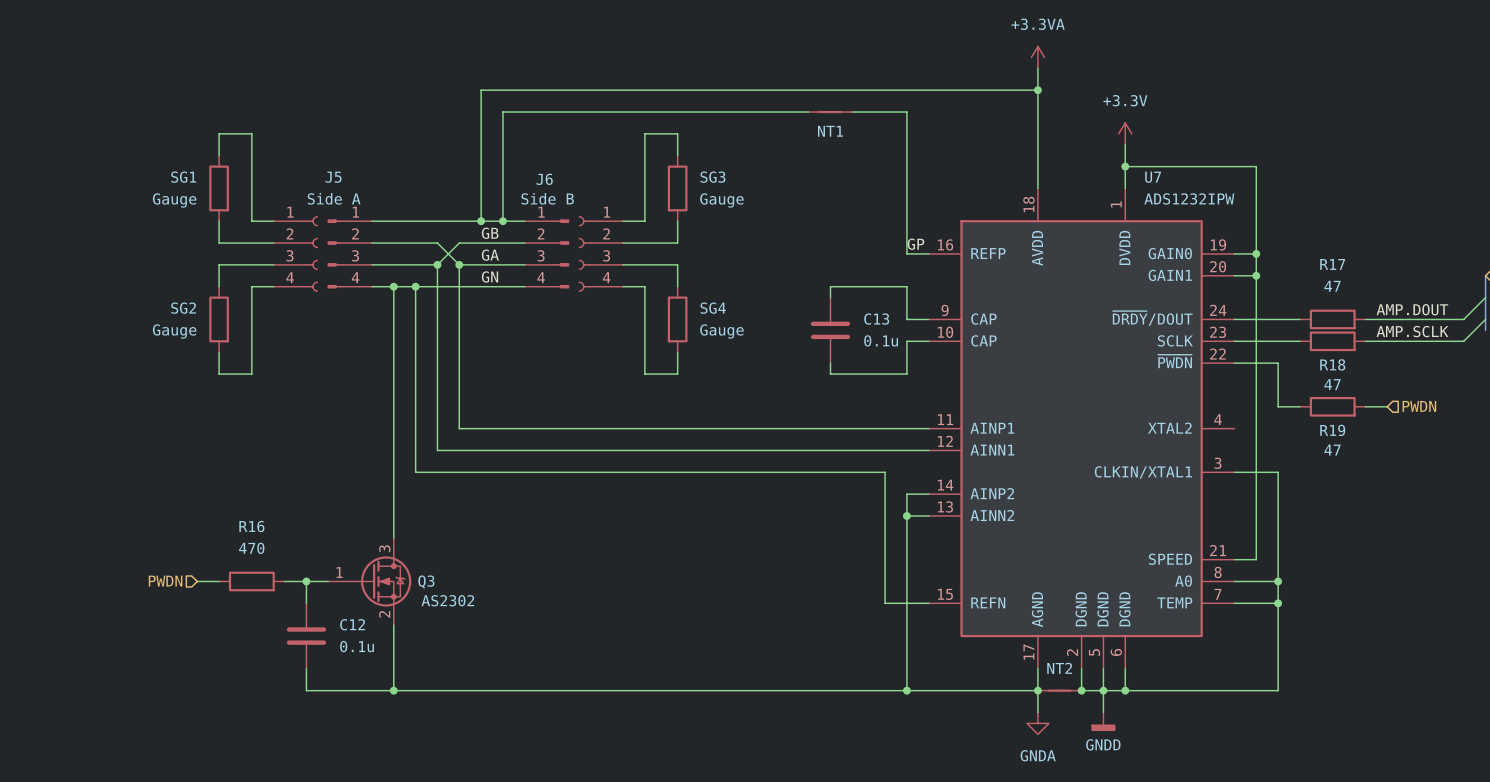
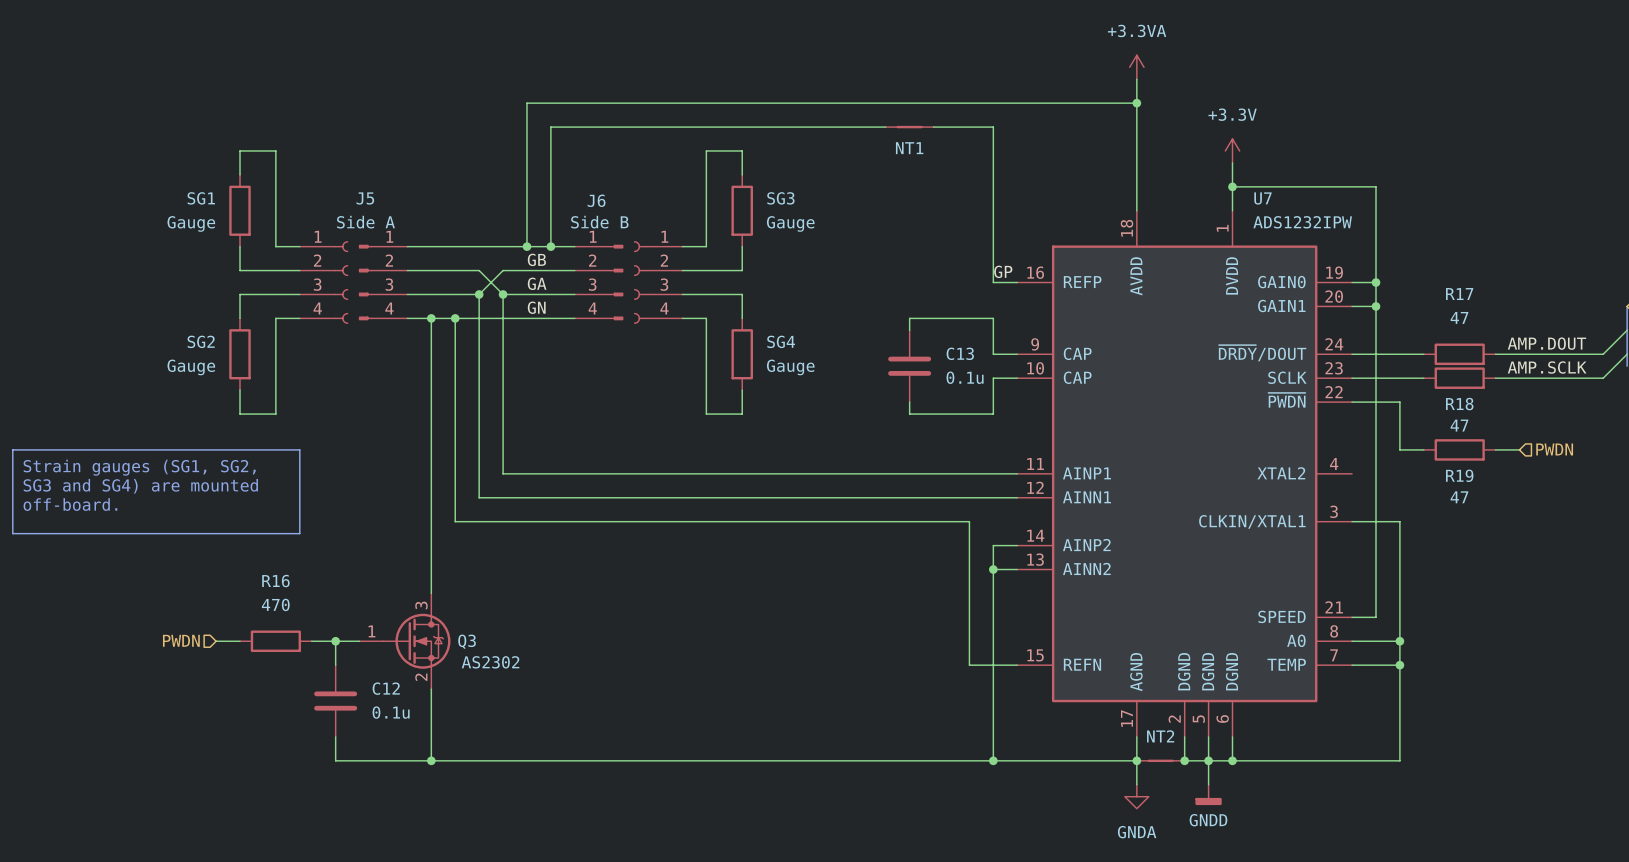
line: none -> (12, 449) (299, 449) (299, 533) (12, 533) (12, 449)
text: none -> Strain gauges (SG1, SG2, (139, 467)
text: none -> SG3 and SG4) are mounted (140, 486)
text: none -> off-board. (70, 504)

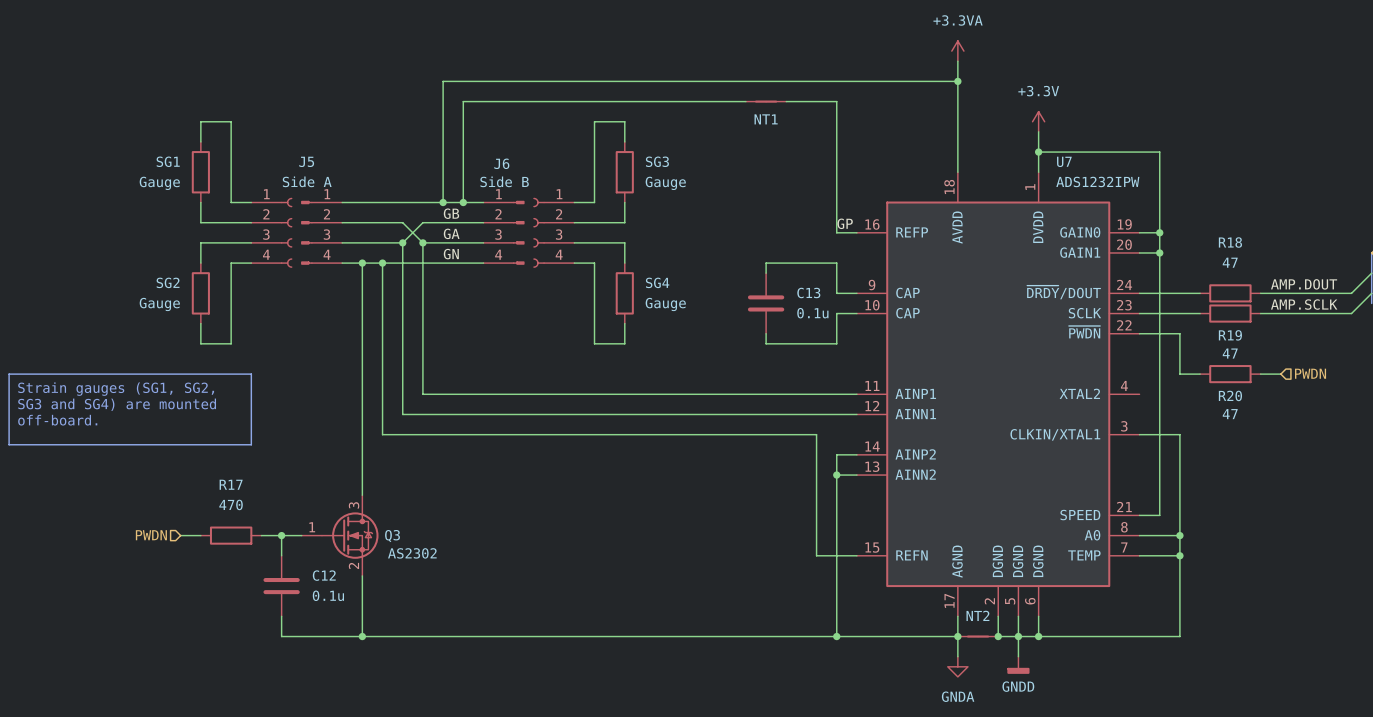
R17 name: R17 (1459, 294) -> R18 (1230, 242)
R18 name: R18 (1459, 404) -> R19 (1230, 335)
R19 name: R19 (1459, 475) -> R20 (1230, 395)
R16 name: R16 (275, 581) -> R17 (231, 484)

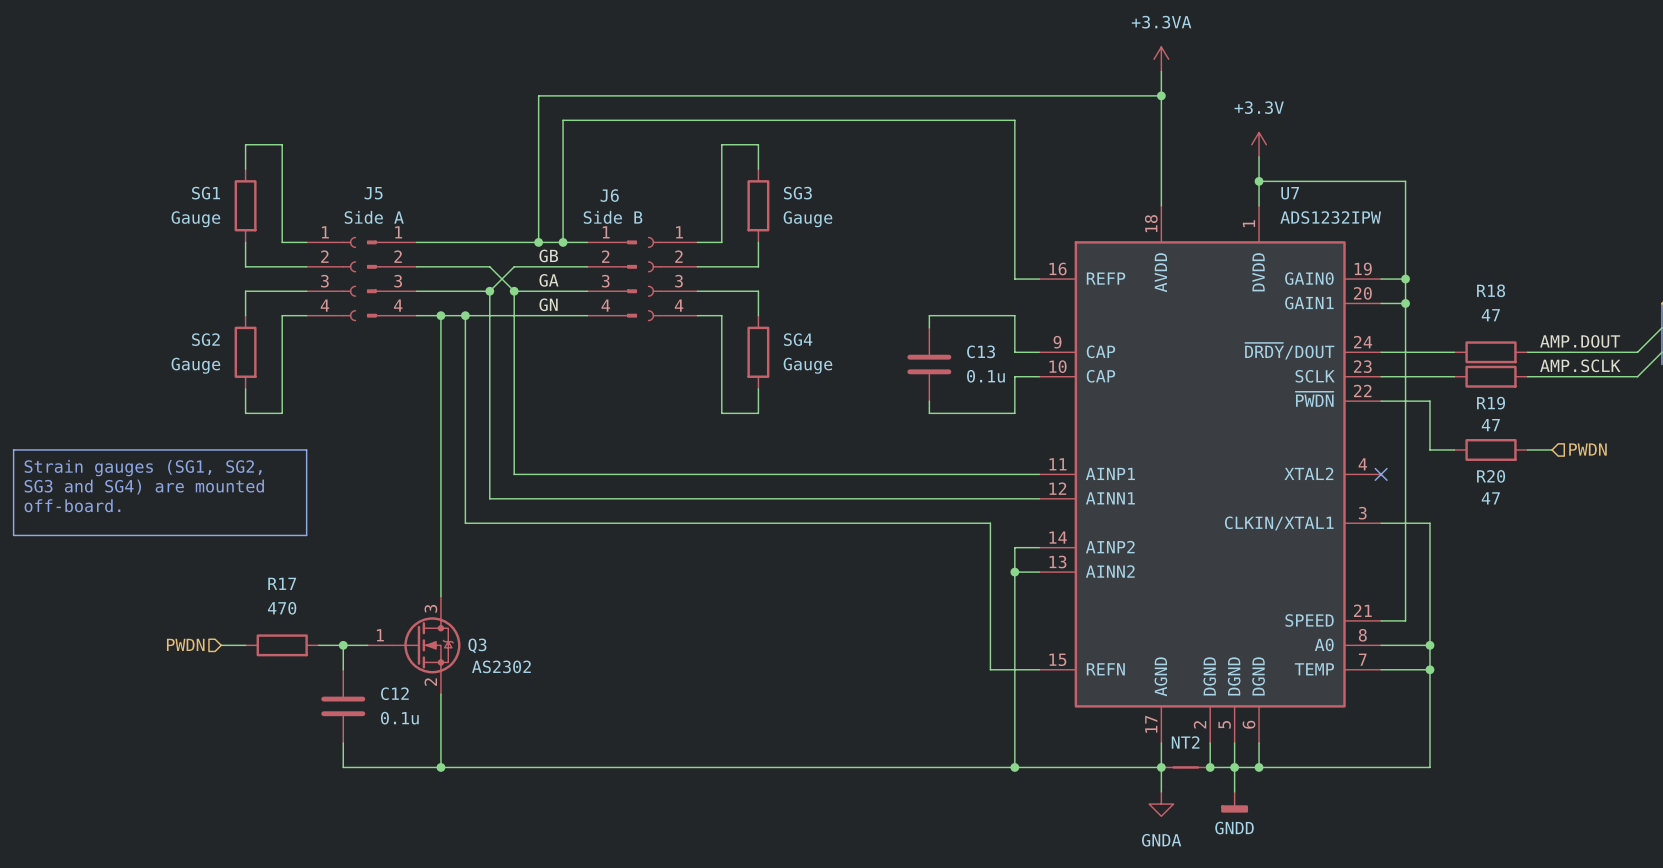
NT1: (766, 101) -> none
label: GP (845, 223) -> none
no-connect mark: none -> (1381, 474)

